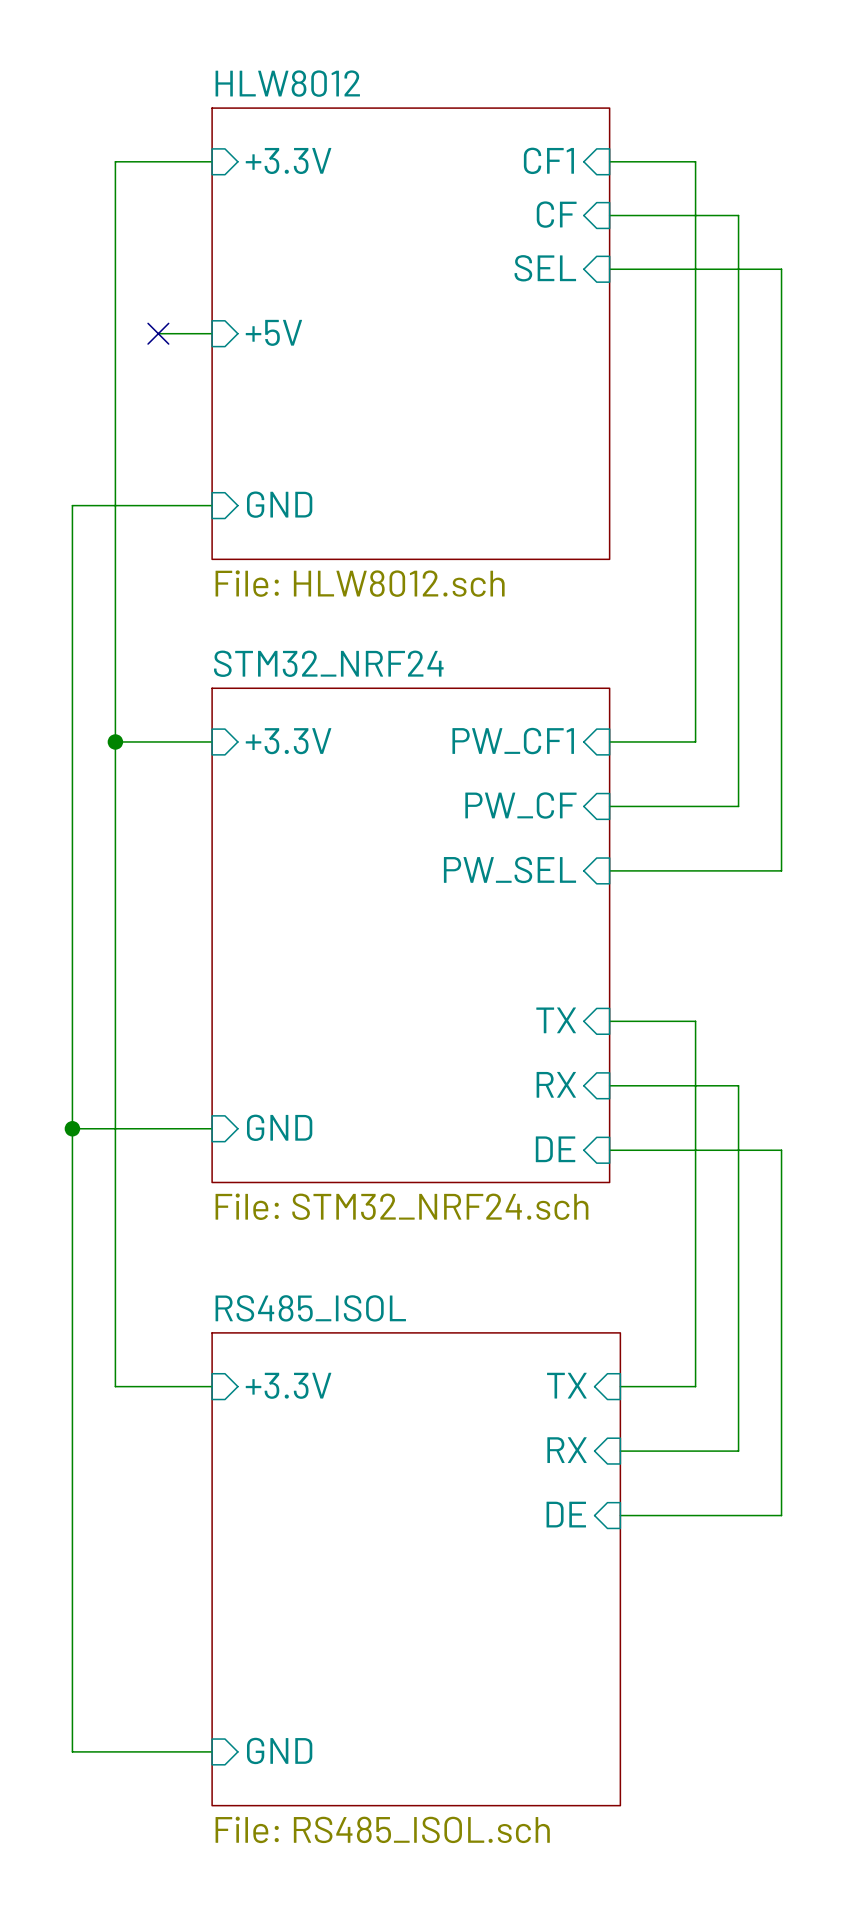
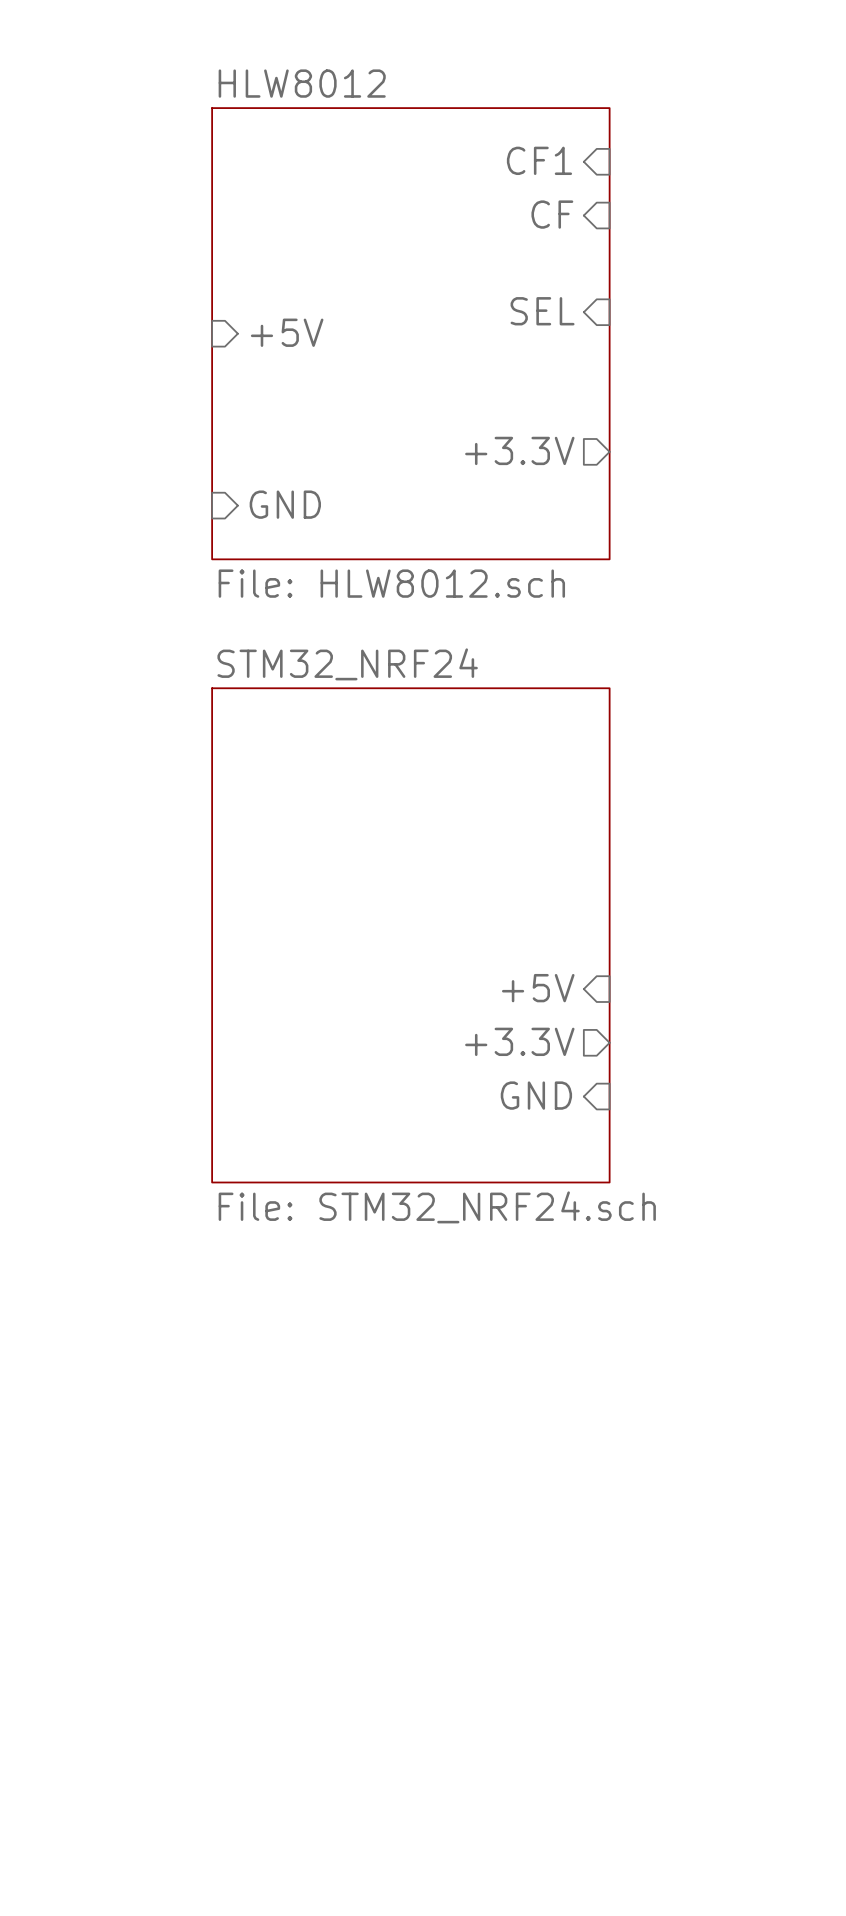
sheet pin: +3.3V (288, 160) -> none
wire: (212, 161) (115, 161) (115, 1386) (212, 1386) -> none
wire: (609, 161) (695, 161) (695, 741) (609, 741) -> none
wire: (609, 215) (738, 215) (738, 806) (609, 806) -> none
sheet pin position: SEL (545, 268) -> SEL (542, 311)
wire: (609, 269) (781, 269) (781, 870) (609, 870) -> none
wire: (158, 333) (212, 333) -> none
no-connect mark: (158, 333) -> none
hierarchical label: none -> +3.3V (519, 450)
wire: (212, 505) (72, 505) (72, 1751) (212, 1751) -> none
wire: (115, 741) (212, 741) -> none
junction: (115, 741) -> none
sheet pin: +3.3V (288, 741) -> none
sheet pin: PW_CF1 (513, 741) -> none
sheet pin: PW_CF (520, 805) -> none
sheet pin: PW_SEL (509, 869) -> none
sheet pin: none -> +5V (538, 988)
sheet pin: TX (556, 1020) -> none
wire: (609, 1021) (695, 1021) (695, 1386) (620, 1386) -> none
hierarchical label: none -> +3.3V (519, 1041)
sheet pin: RX (556, 1084) -> none
wire: (609, 1085) (738, 1085) (738, 1451) (620, 1451) -> none
sheet pin rotation: 0° (279, 1127) -> 180° (536, 1095)
sheet pin position: GND (279, 1127) -> GND (536, 1095)
wire: (72, 1128) (212, 1128) -> none
junction: (72, 1128) -> none
sheet pin: DE (555, 1149) -> none
wire: (609, 1150) (781, 1150) (781, 1515) (620, 1515) -> none
sheet pin: +3.3V (288, 1385) -> none
sheet pin: TX (566, 1385) -> none
sheet pin: RX (567, 1450) -> none
sheet pin: DE (566, 1514) -> none
sheet RS485_ISOL: File: RS485_ISOL.sch (416, 1569) -> none
sheet pin: GND (279, 1750) -> none

